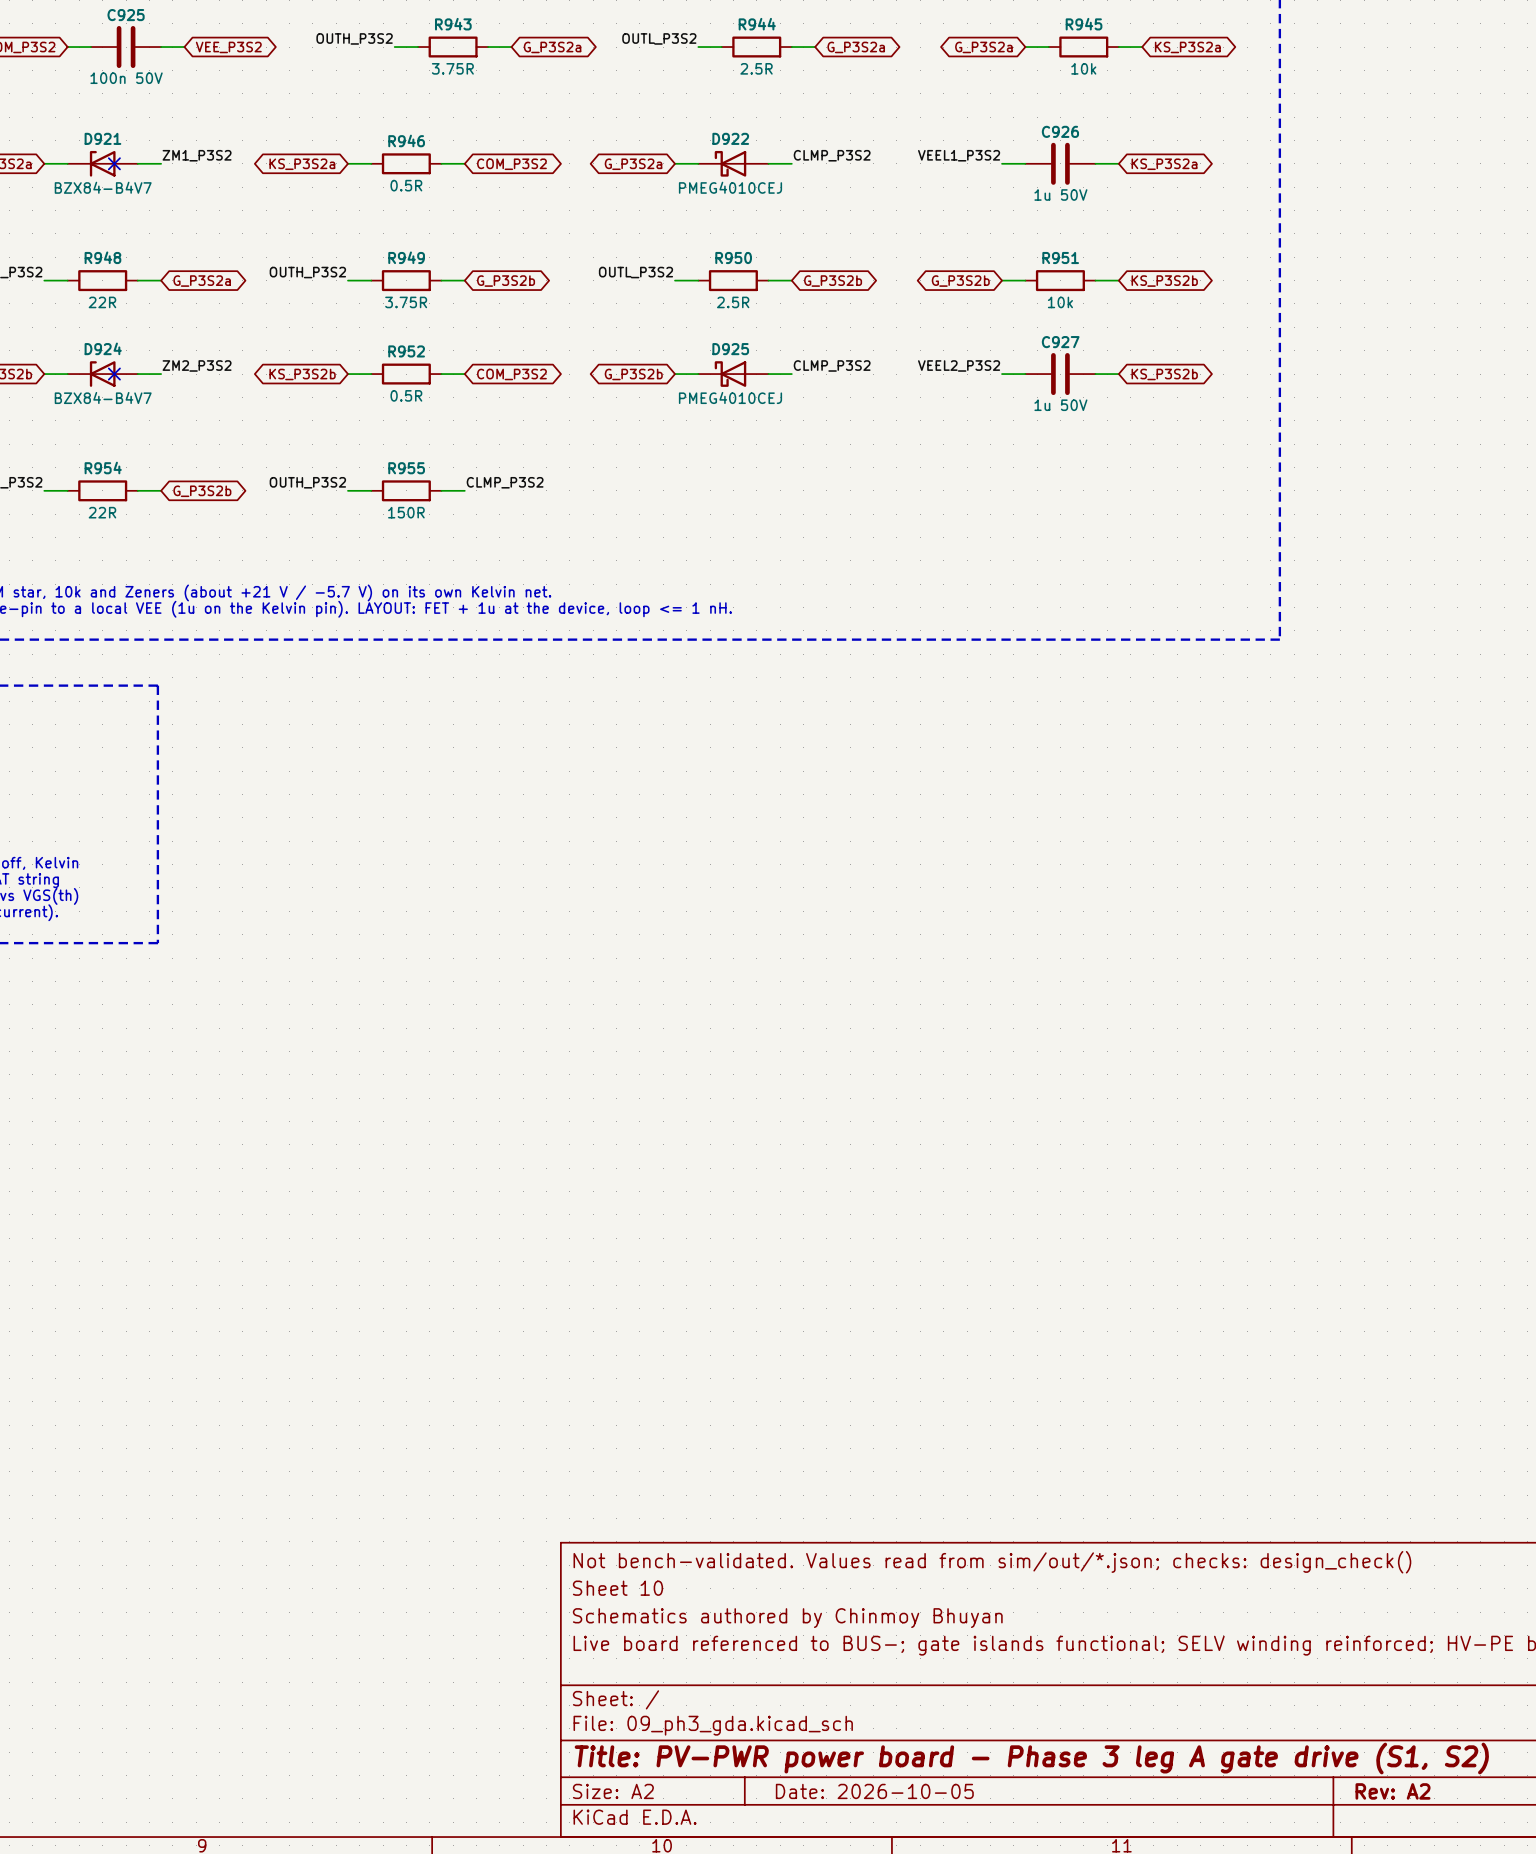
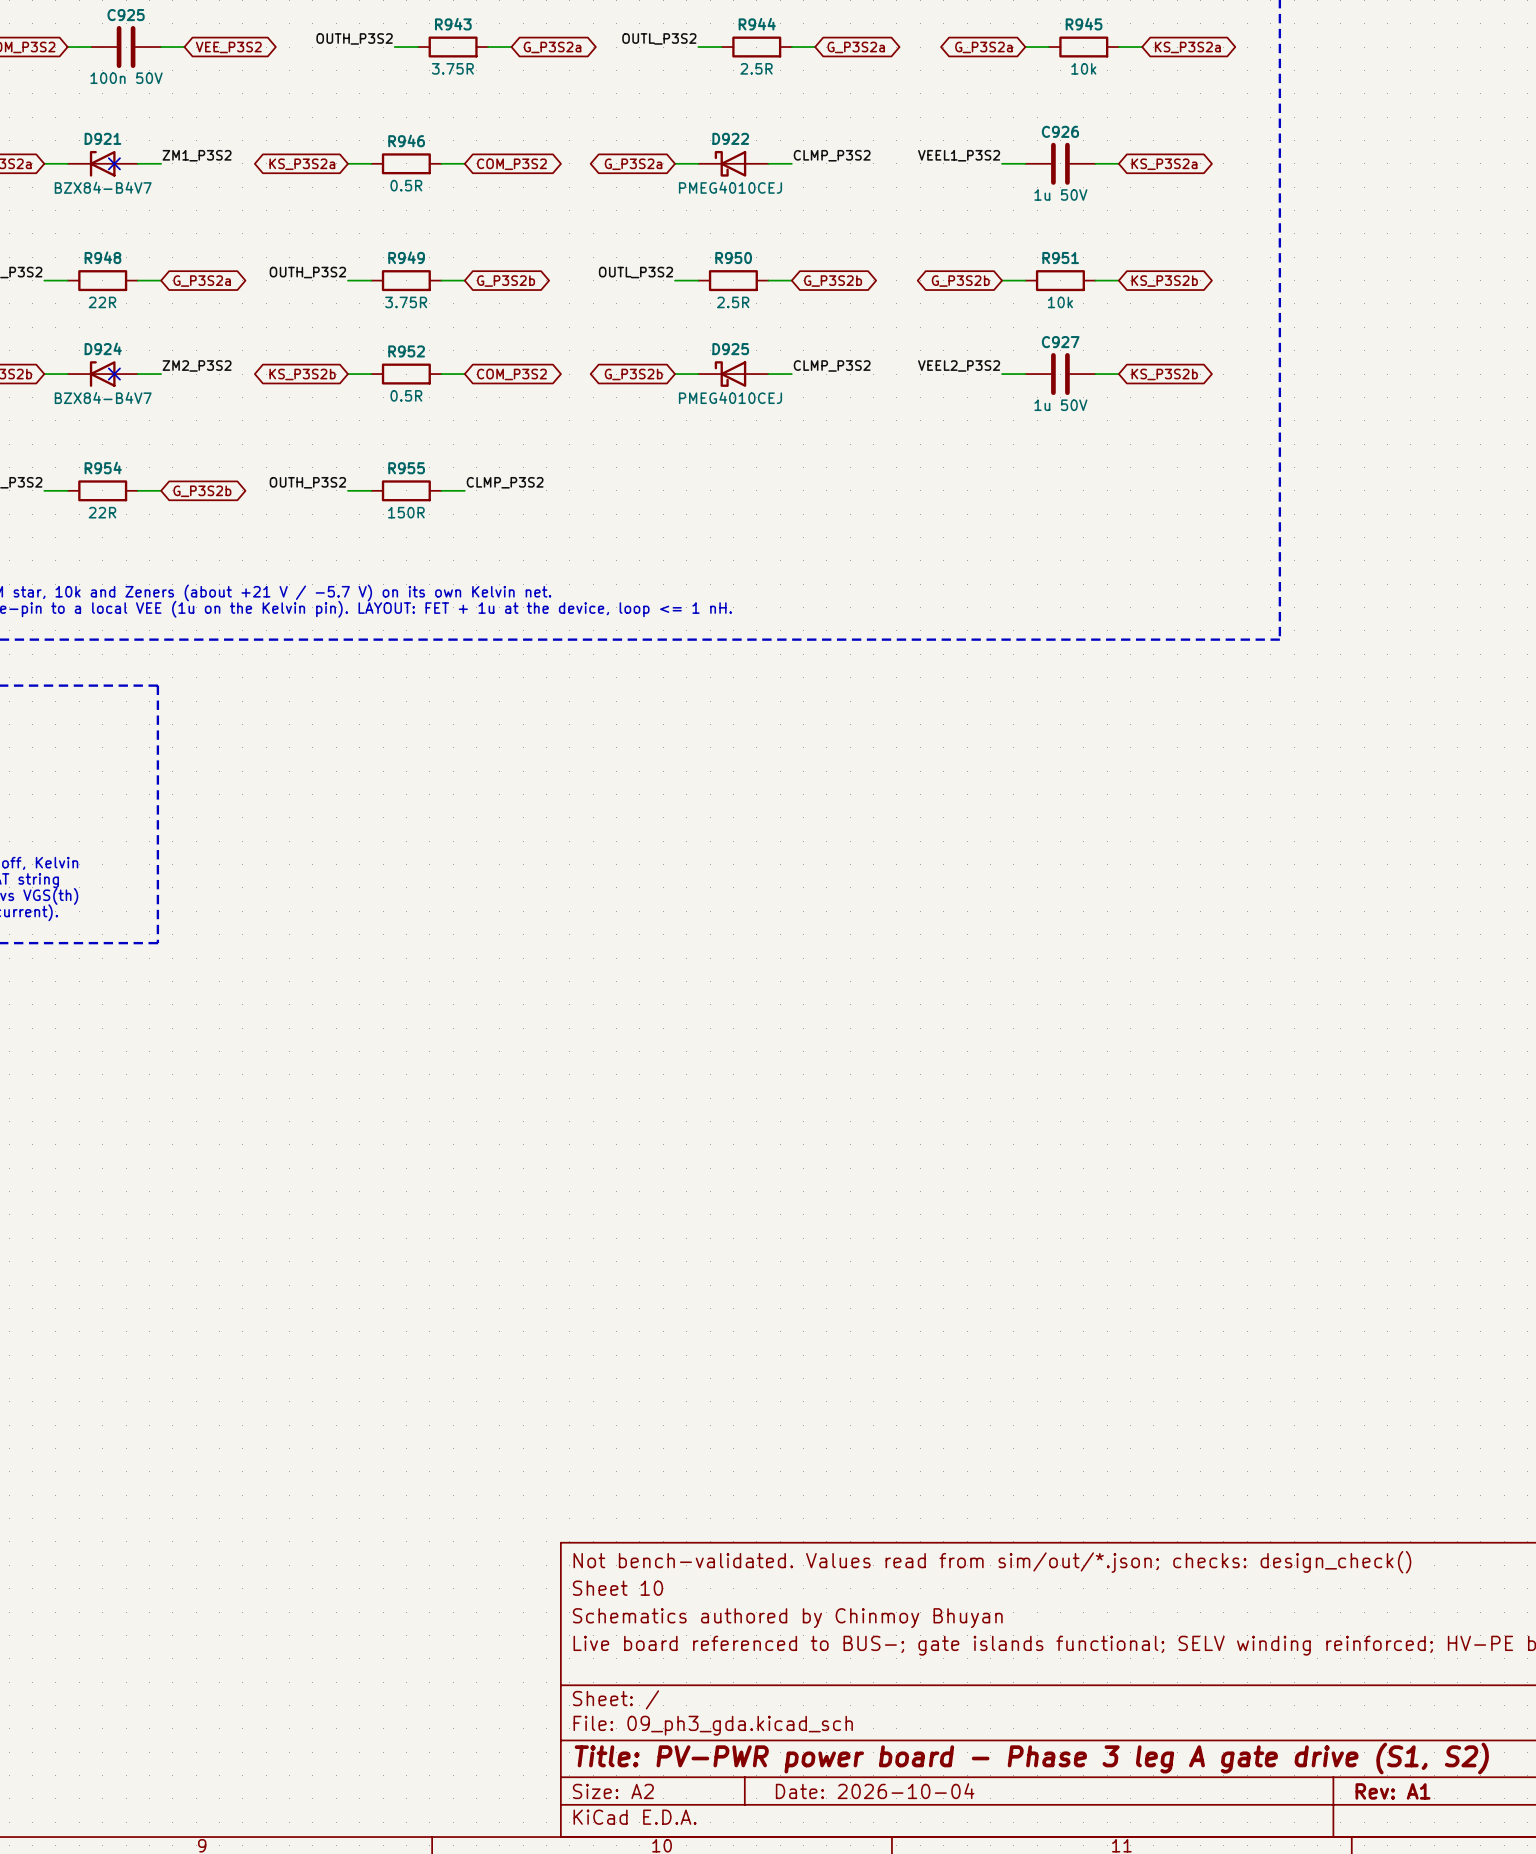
title block: Date: 2026-10-05 (874, 1791) -> Date: 2026-10-04 (875, 1791)
title block: Rev: A2 (1393, 1791) -> Rev: A1 (1393, 1791)

